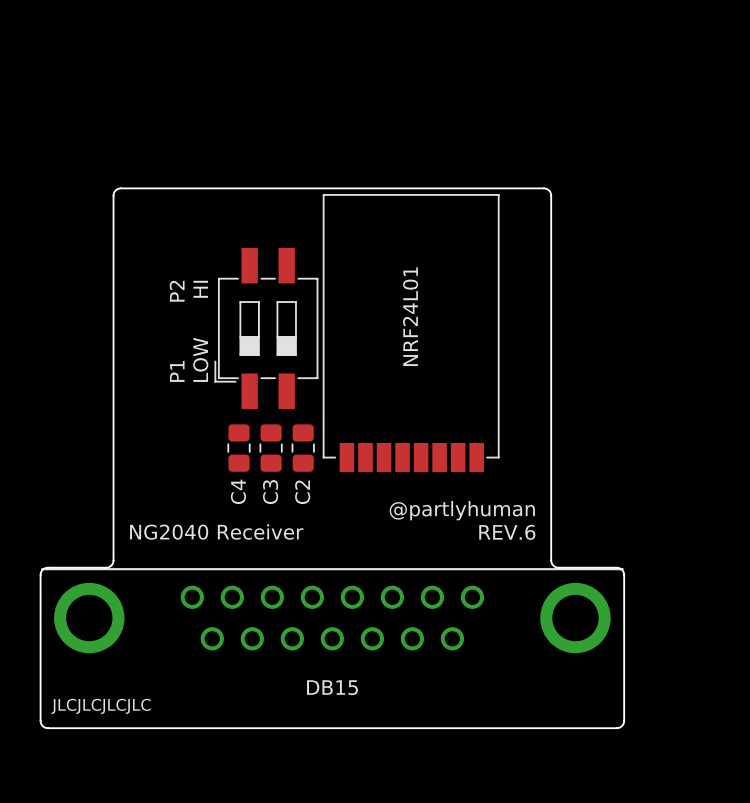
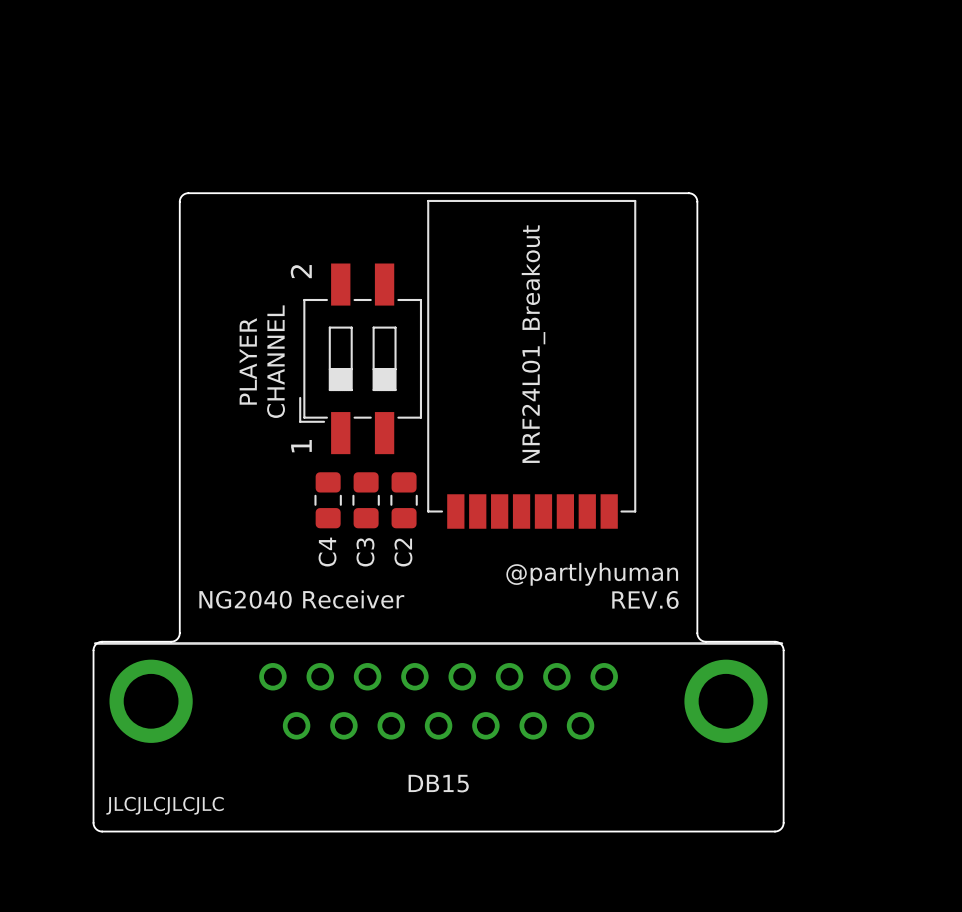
text: none -> 2 (301, 271)
text: HI (200, 289) -> none
text: P2 (177, 291) -> none
part value: NRF24L01 (410, 316) -> NRF24L01_Breakout (533, 344)
text: none -> PLAYER (248, 361)
text: none -> CHANNEL (276, 361)
text: LOW (200, 359) -> none
text: P1 (177, 371) -> none
text: none -> 1 (301, 446)

